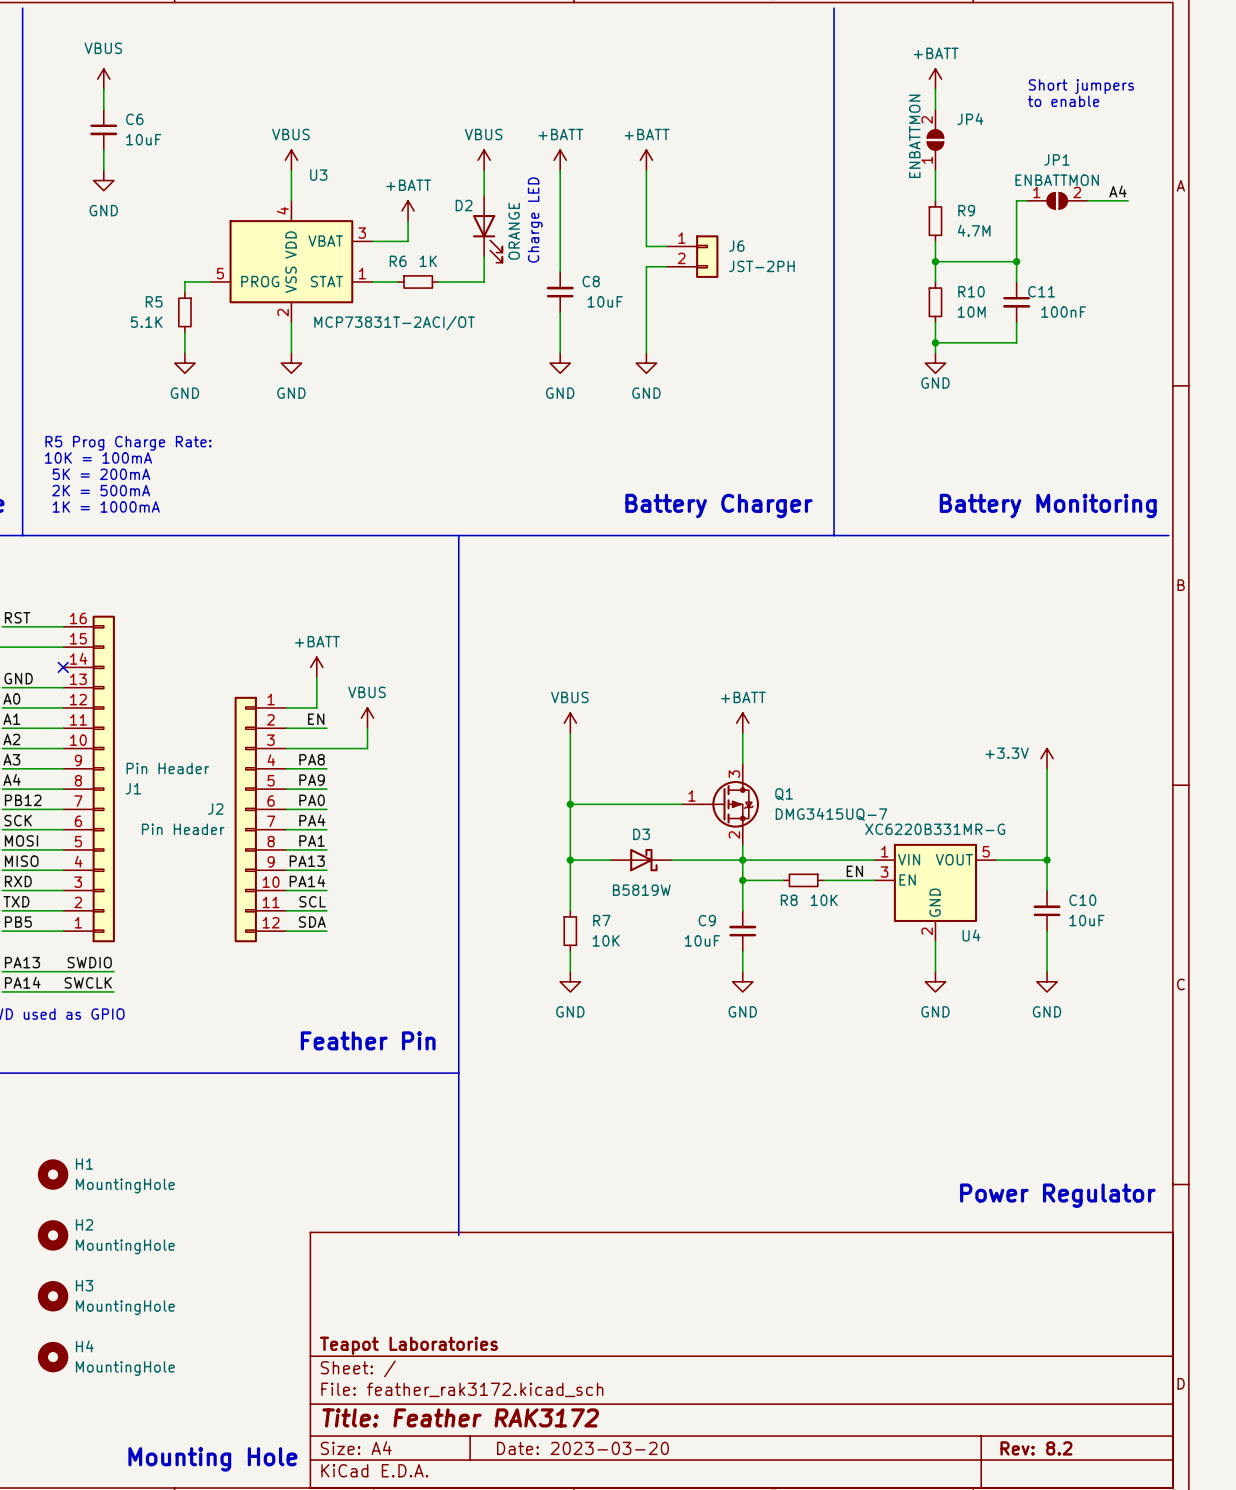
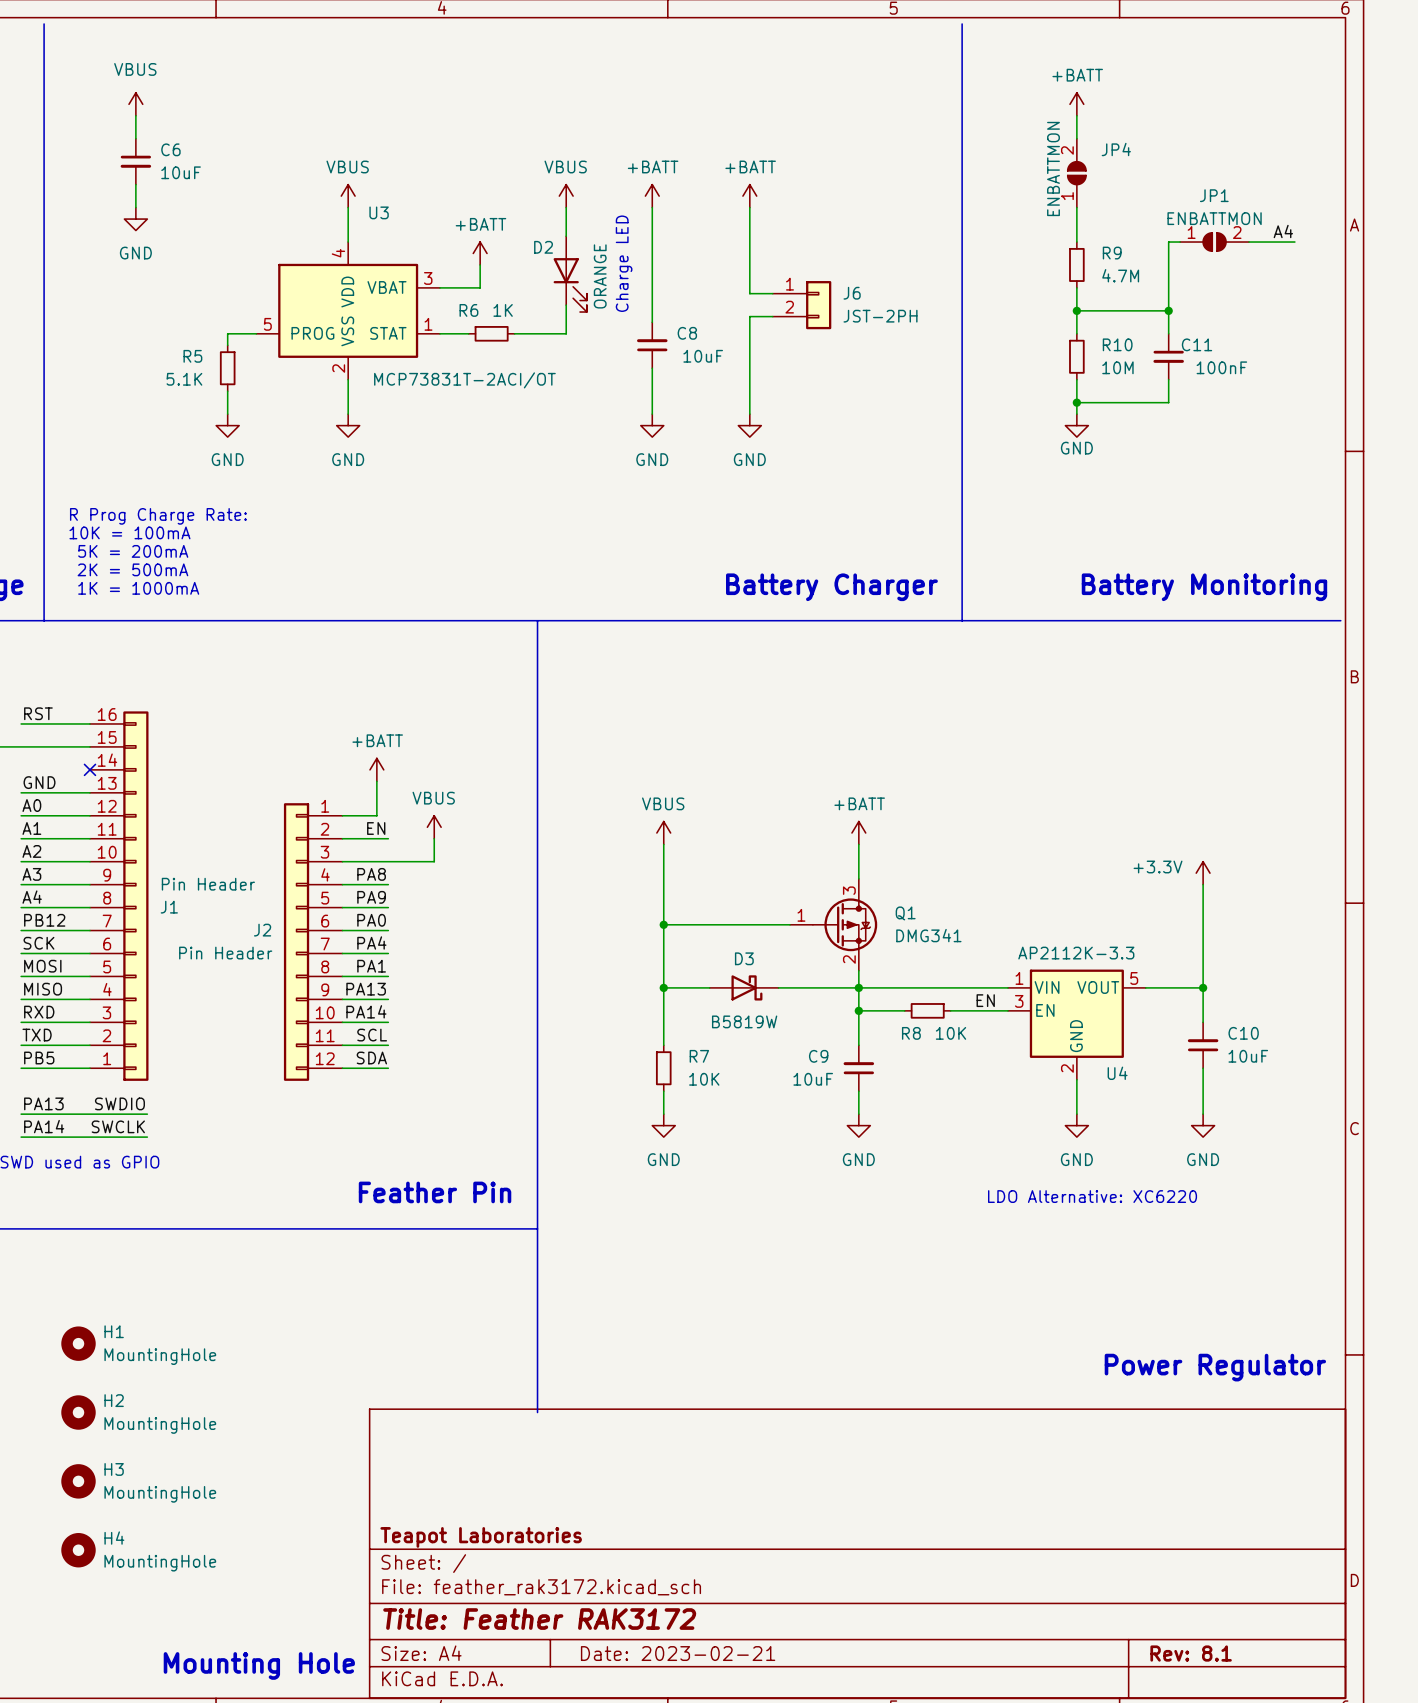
text: Short jumpers (1081, 86) -> none
text: to enable (1063, 101) -> none
text: R5 Prog Charge Rate: (128, 443) -> R Prog Charge Rate: (158, 516)
Q1 value: DMG3415UQ-7 (831, 814) -> DMG341 (928, 935)
U4 value: XC6220B331MR-G (935, 829) -> AP2112K-3.3 (1076, 953)
text: none -> LDO Alternative: XC6220 (1092, 1196)
title block: Date: 2023-03-20 (583, 1448) -> Date: 2023-02-21 (678, 1653)
title block: Rev: 8.2 (1036, 1448) -> Rev: 8.1 (1191, 1653)

